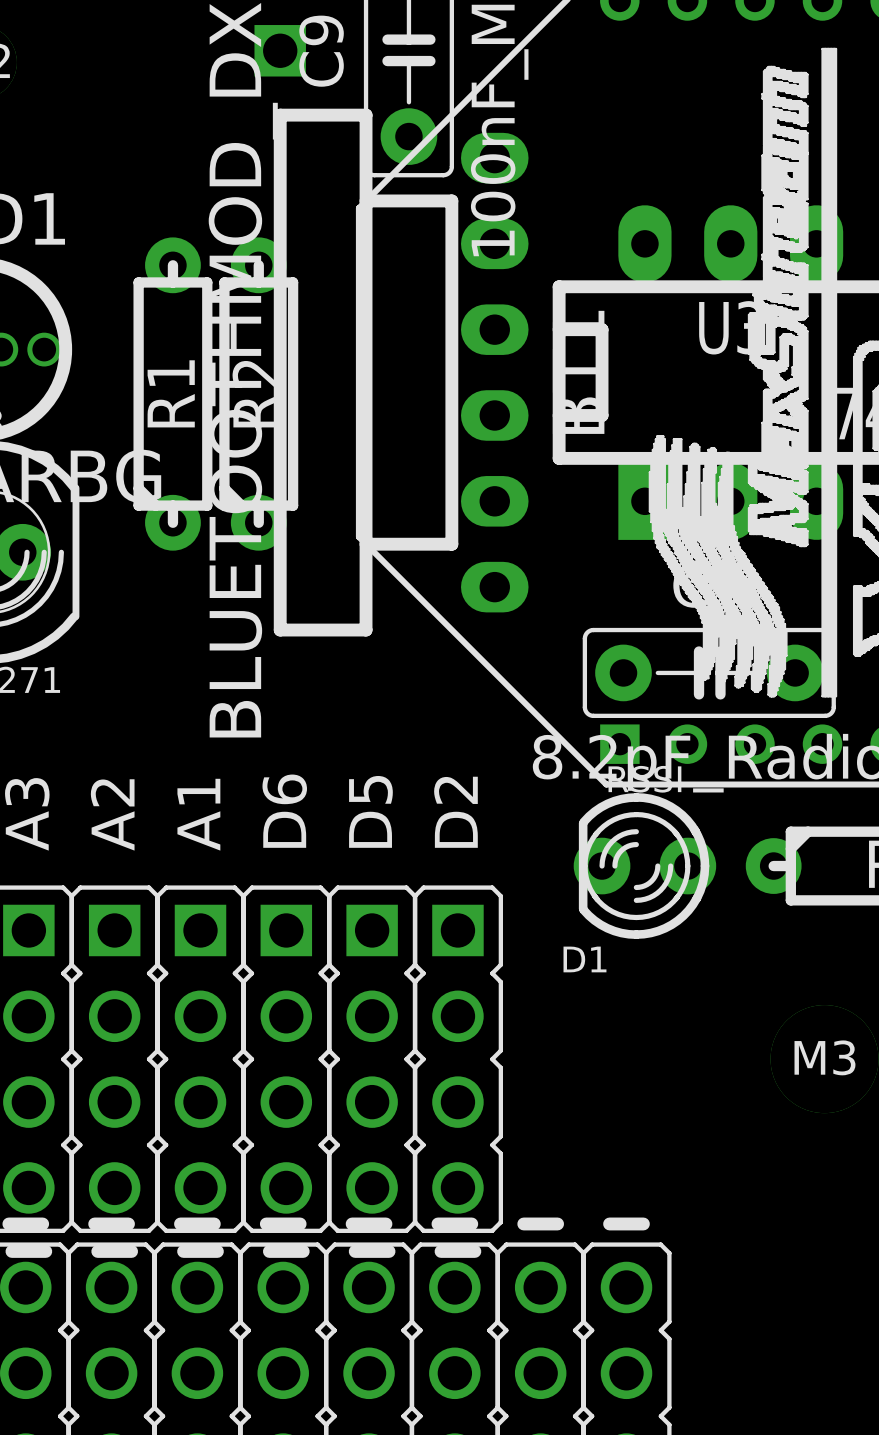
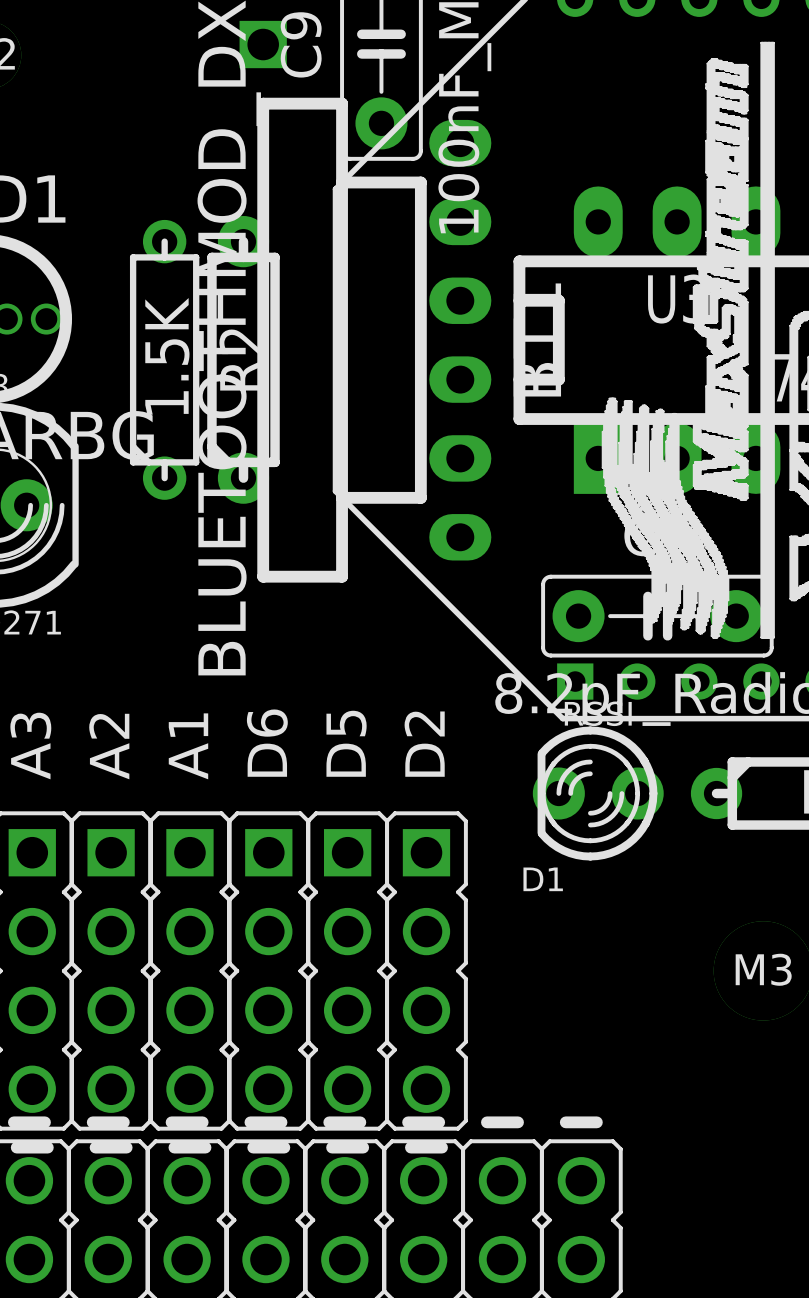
R1: (172, 394) -> none
part: none -> 1.5K (164, 359)

